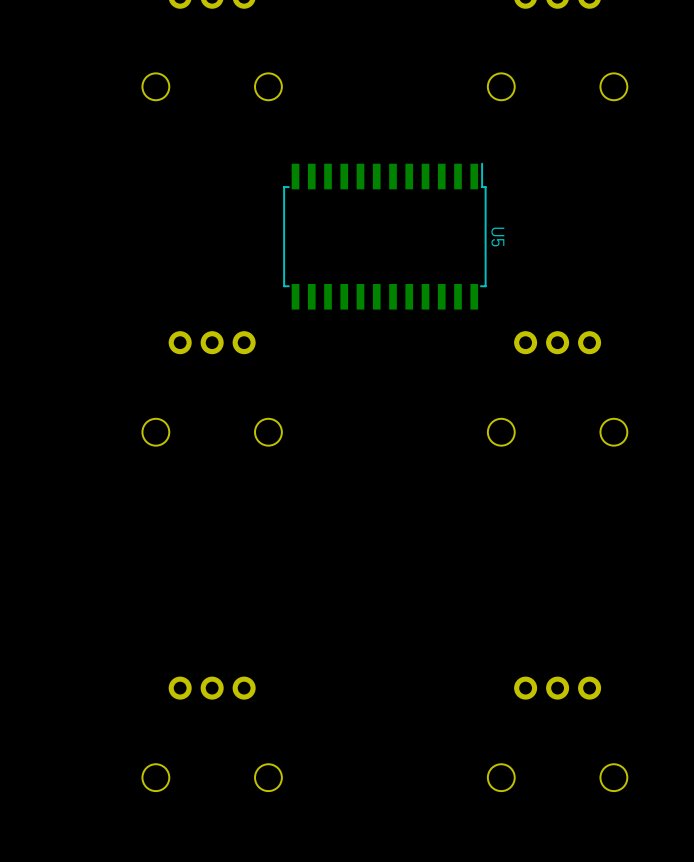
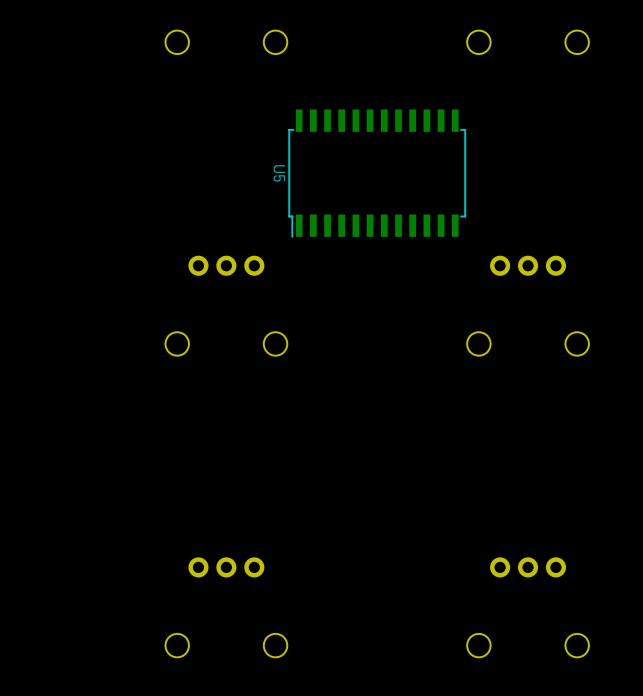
U5 rotation: 0° (384, 236) -> 180° (377, 173)

